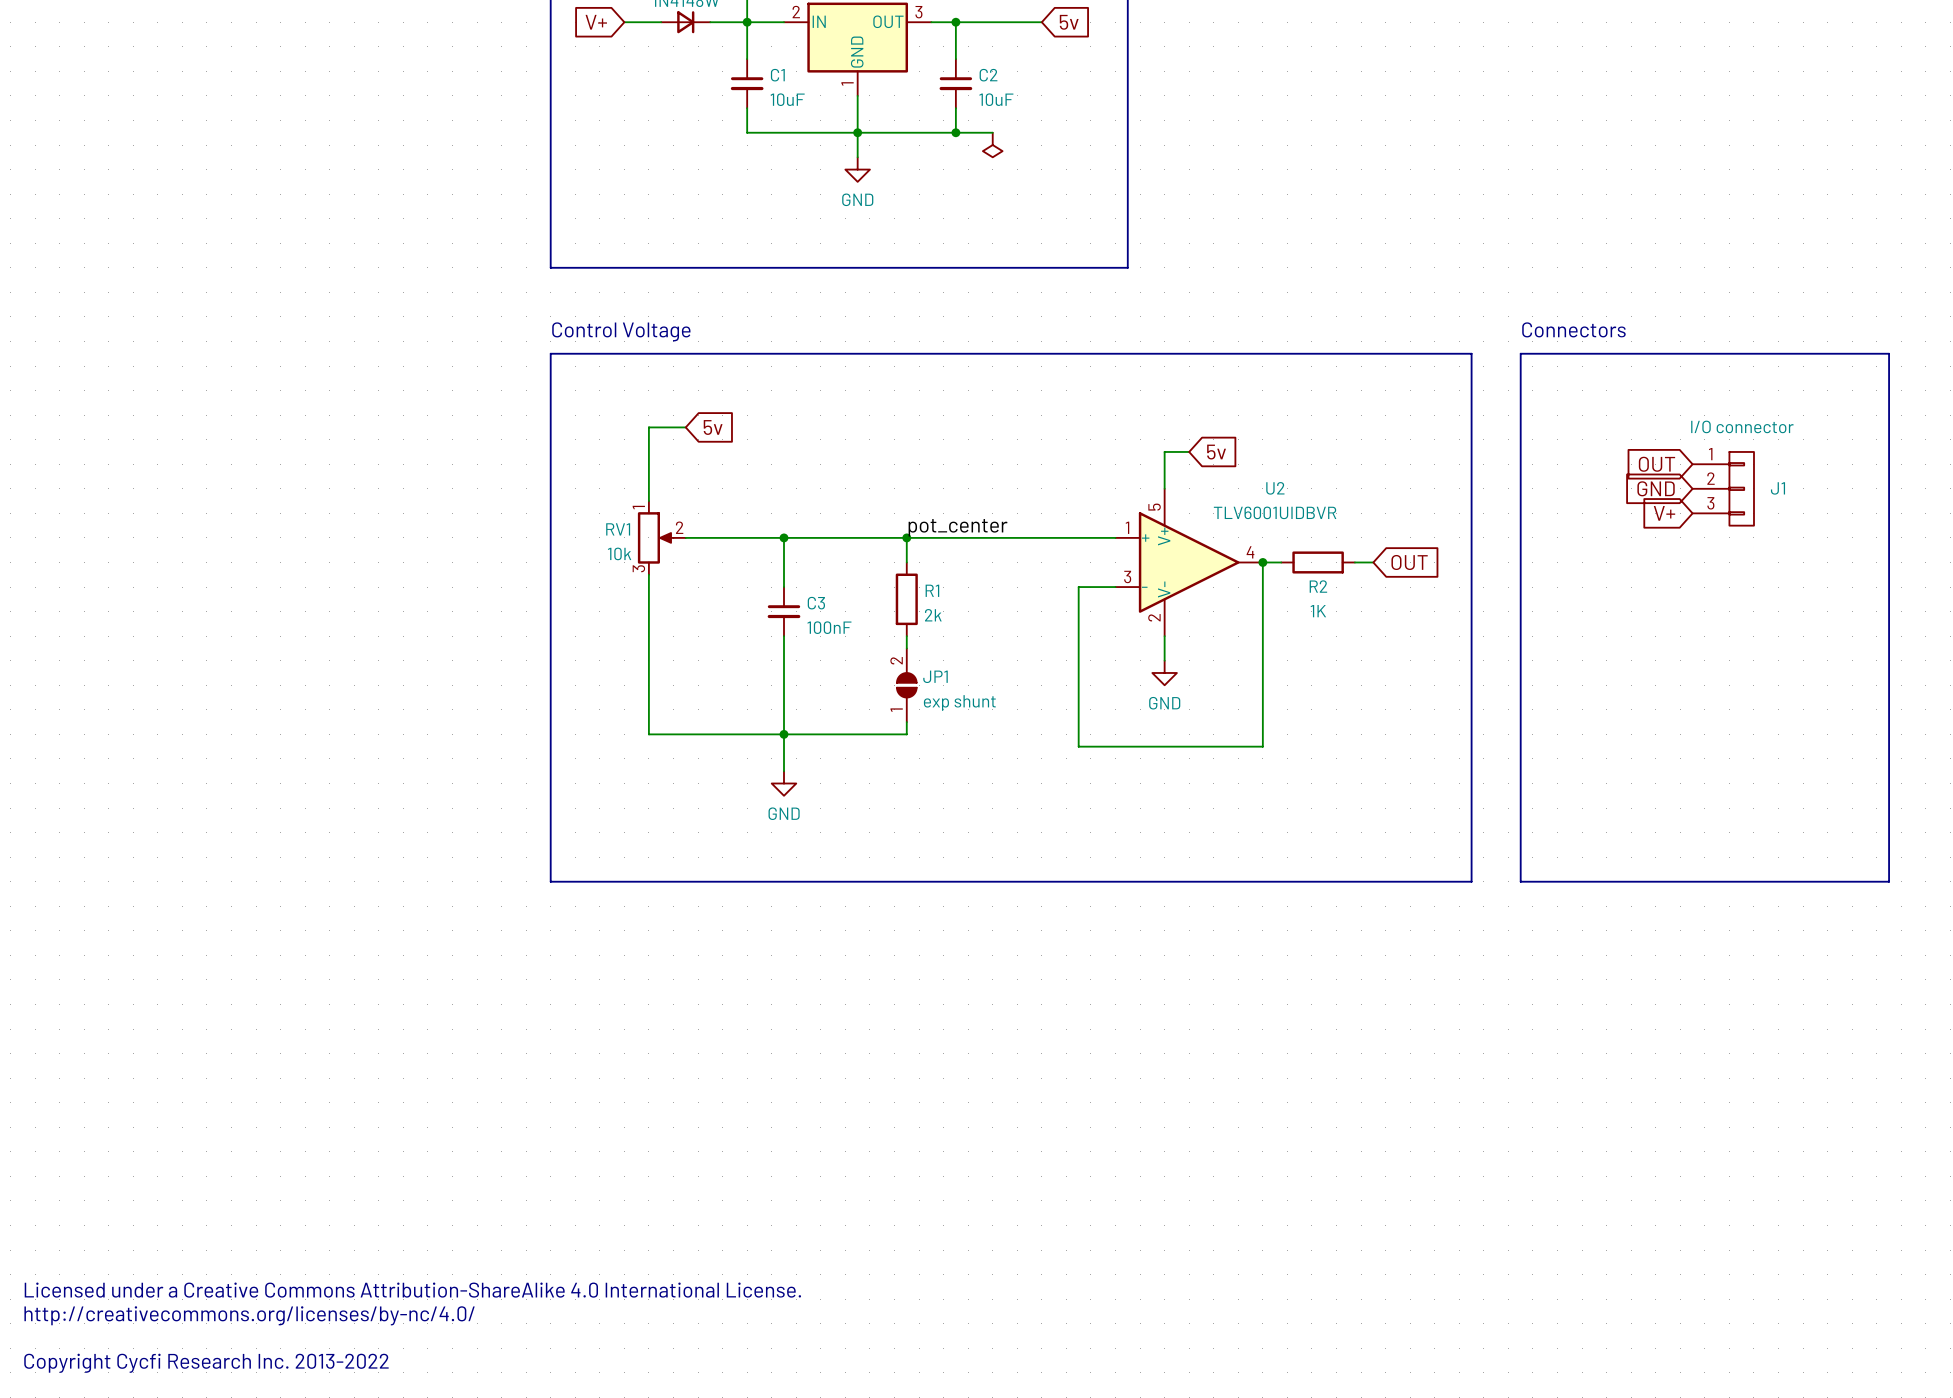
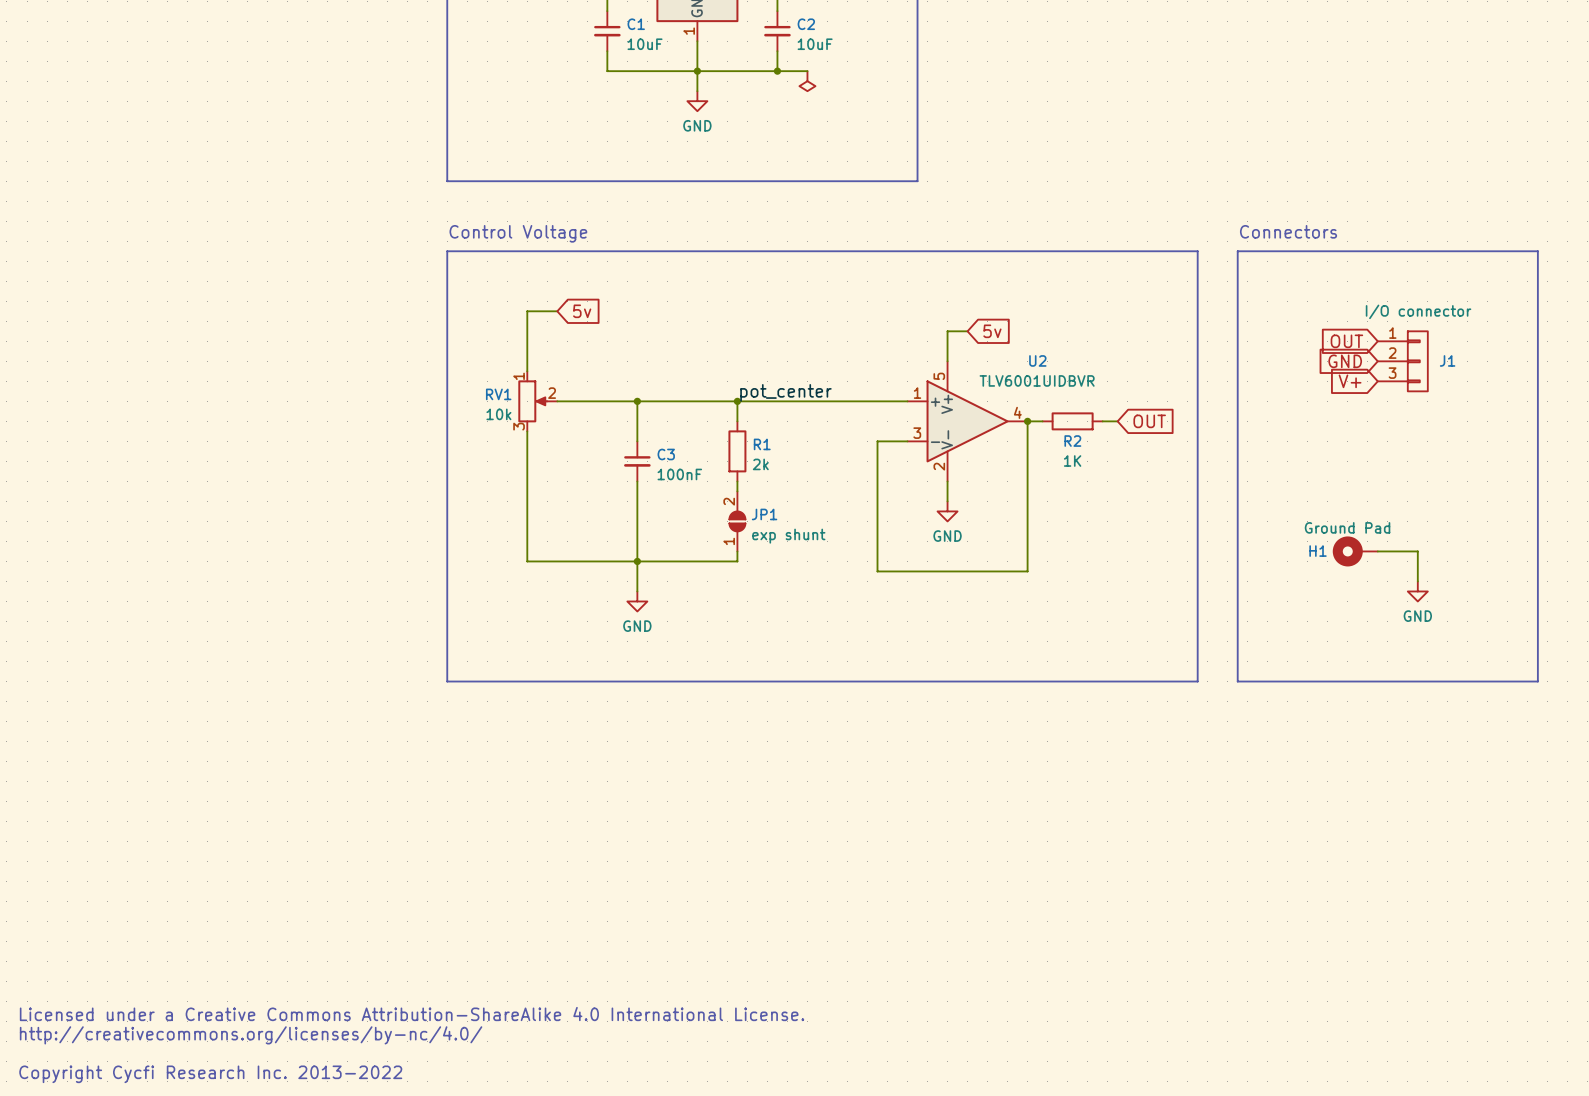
H1: none -> Ground Pad (1355, 551)
wire: none -> (1377, 551) (1417, 551) (1417, 581)
power symbol: none -> GND (1417, 591)

